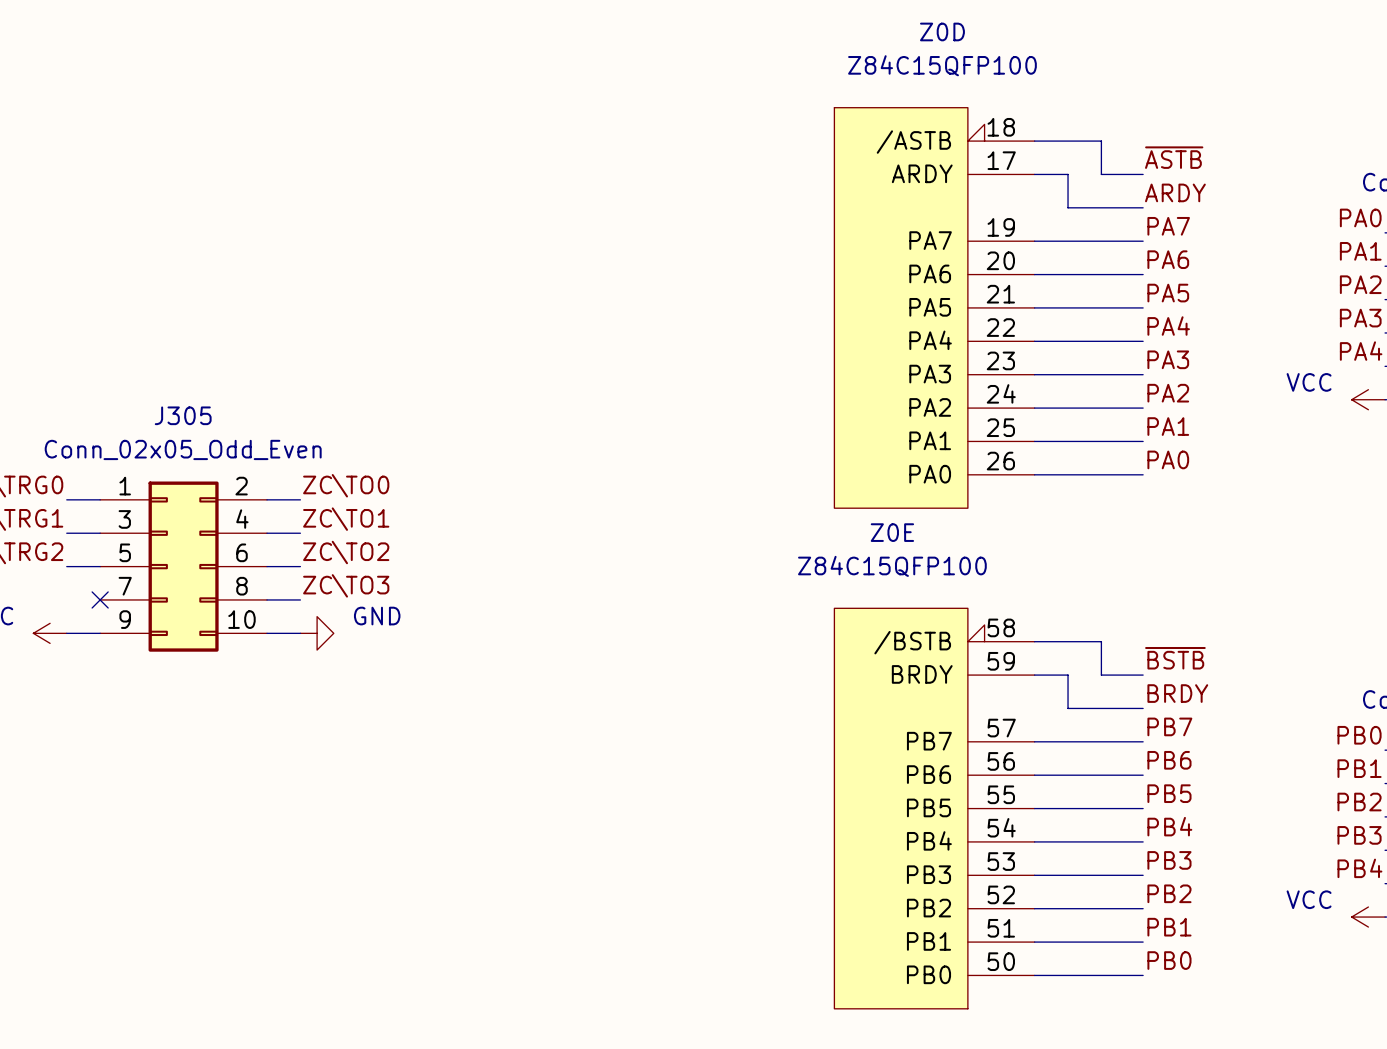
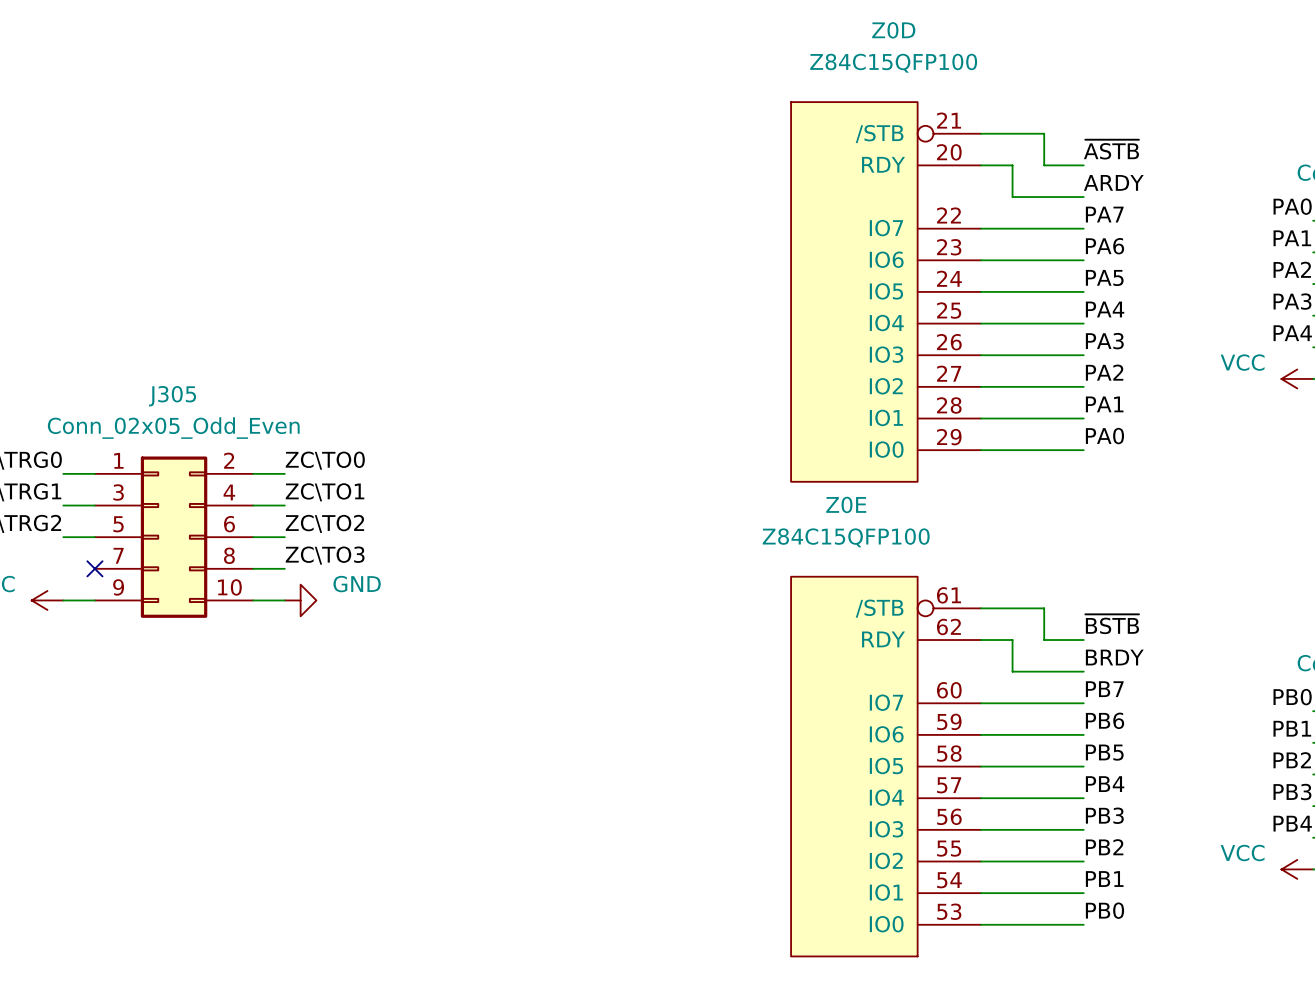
Z0D symbol: [834, 107, 1035, 509] -> [791, 102, 981, 482]
Z0E symbol: [734, 608, 1035, 1009] -> [696, 576, 981, 957]

